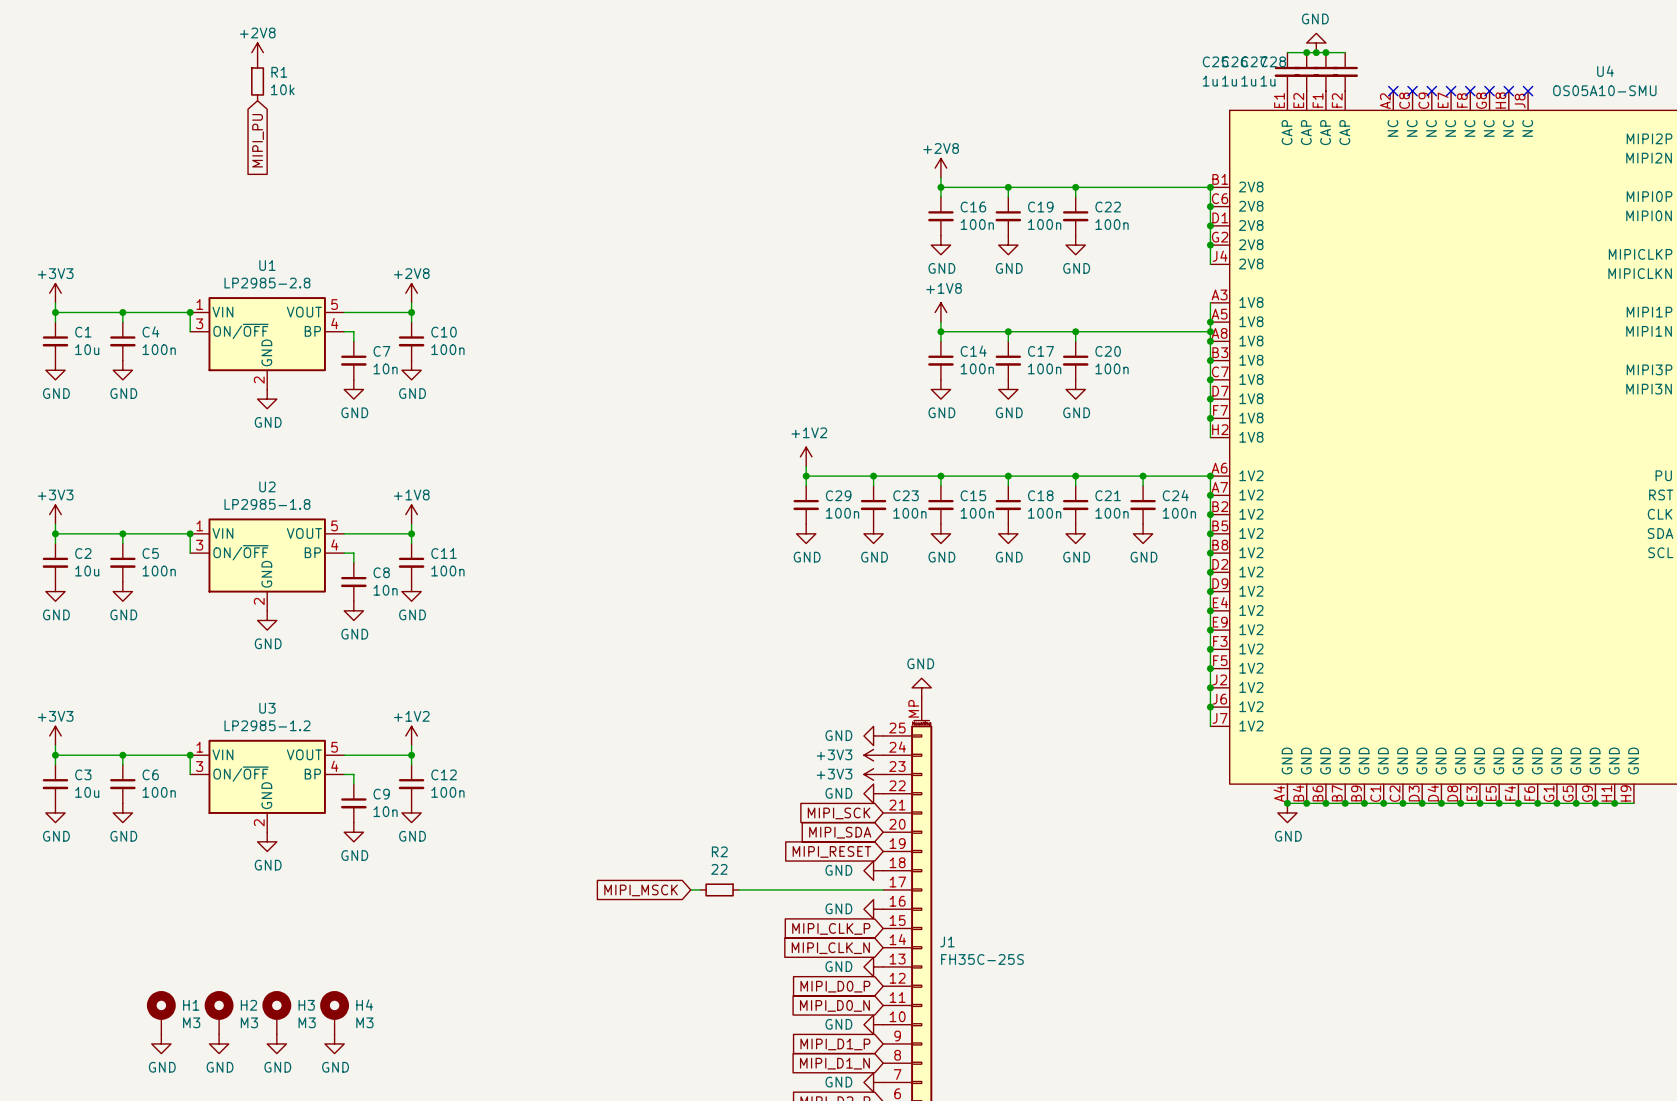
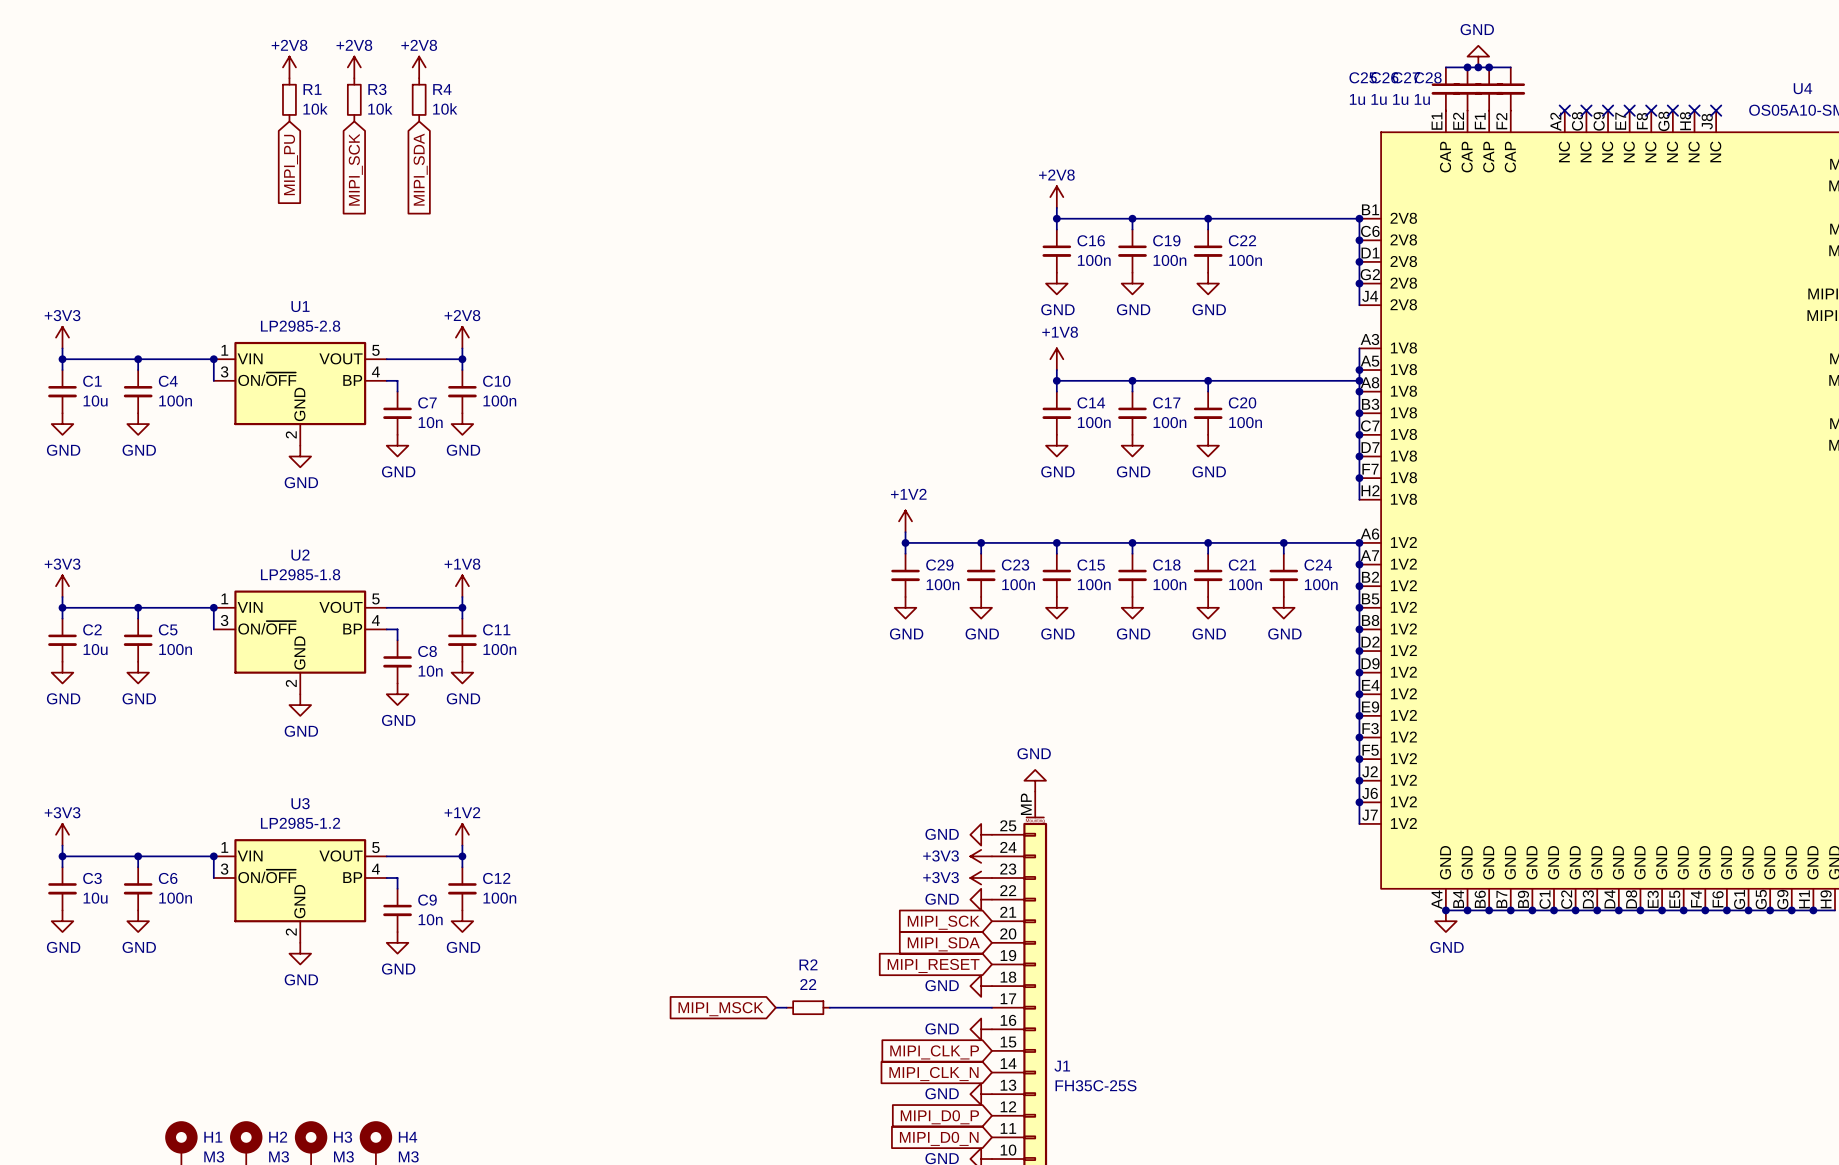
power symbol: none -> +2V8 (354, 67)
power symbol: none -> +2V8 (419, 67)
R3: none -> 10k (354, 99)
R4: none -> 10k (419, 99)
global label: none -> MIPI_SDA (420, 169)
global label: none -> MIPI_SCK (355, 169)

